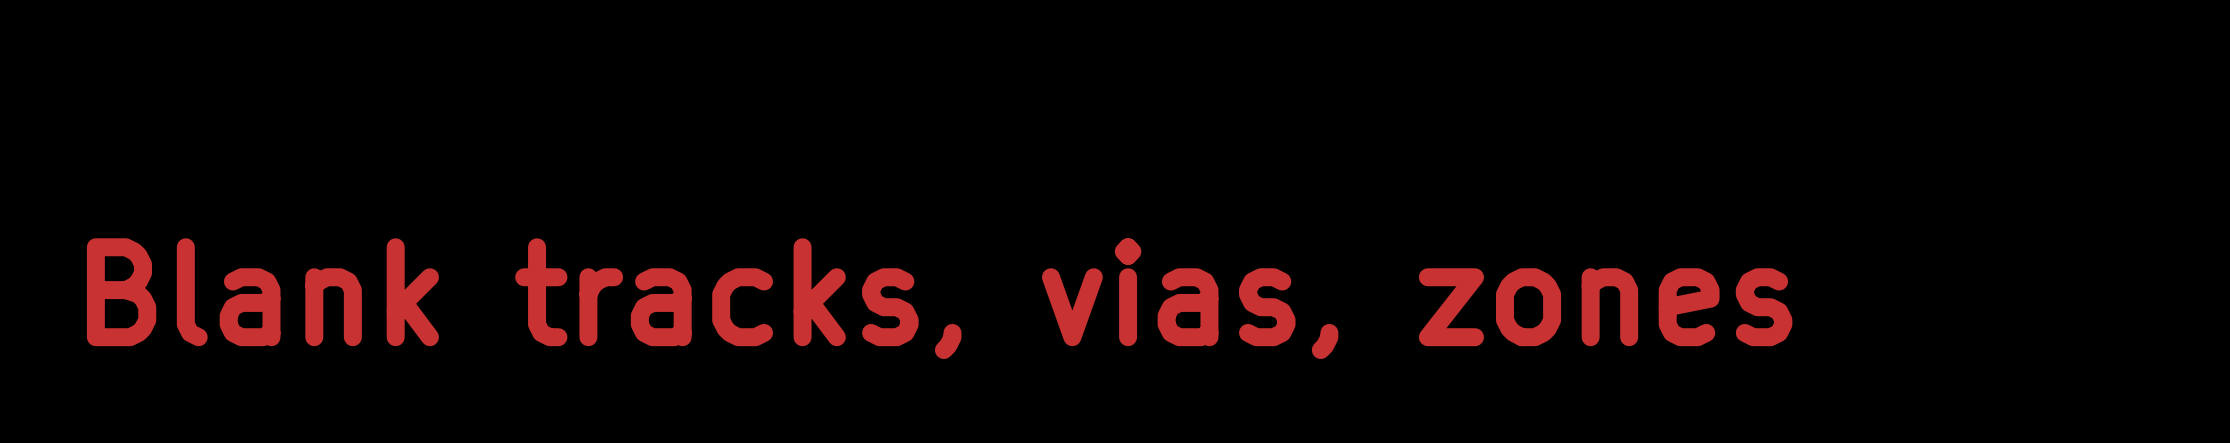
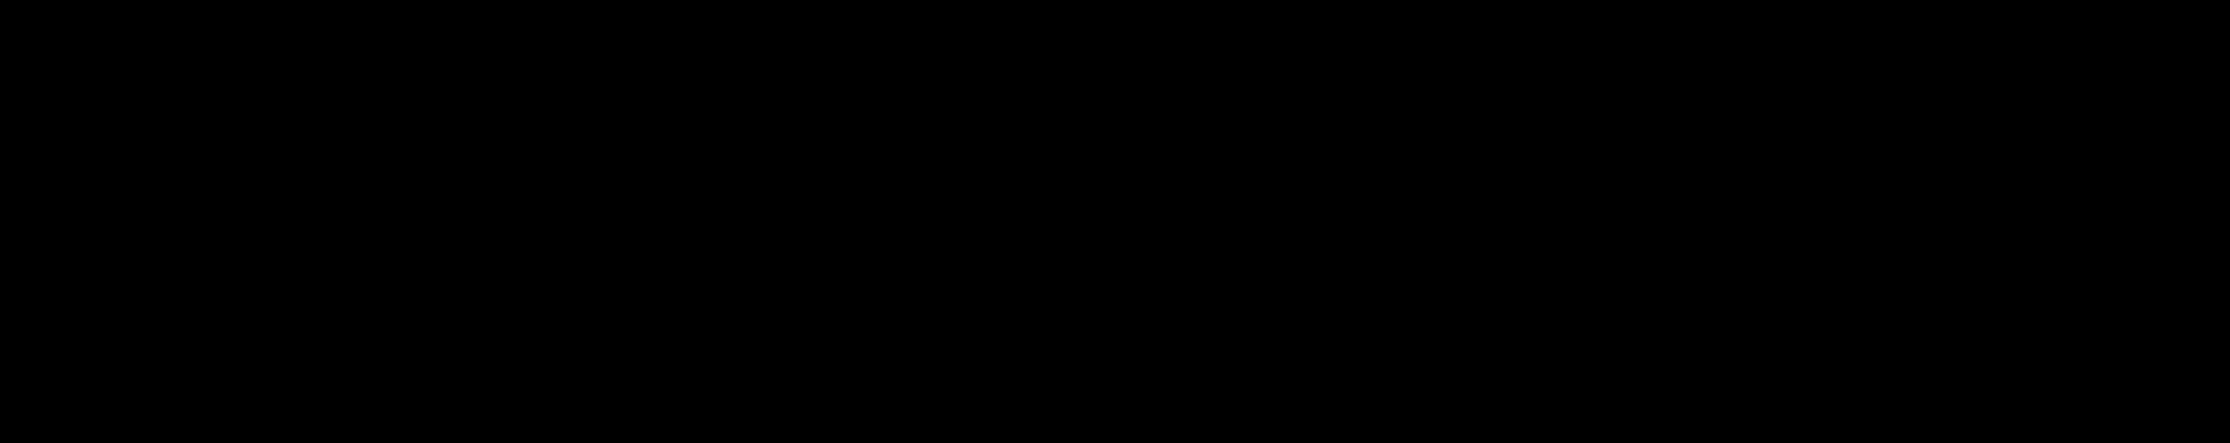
text: Blank tracks, vias, zones (939, 298) -> none

